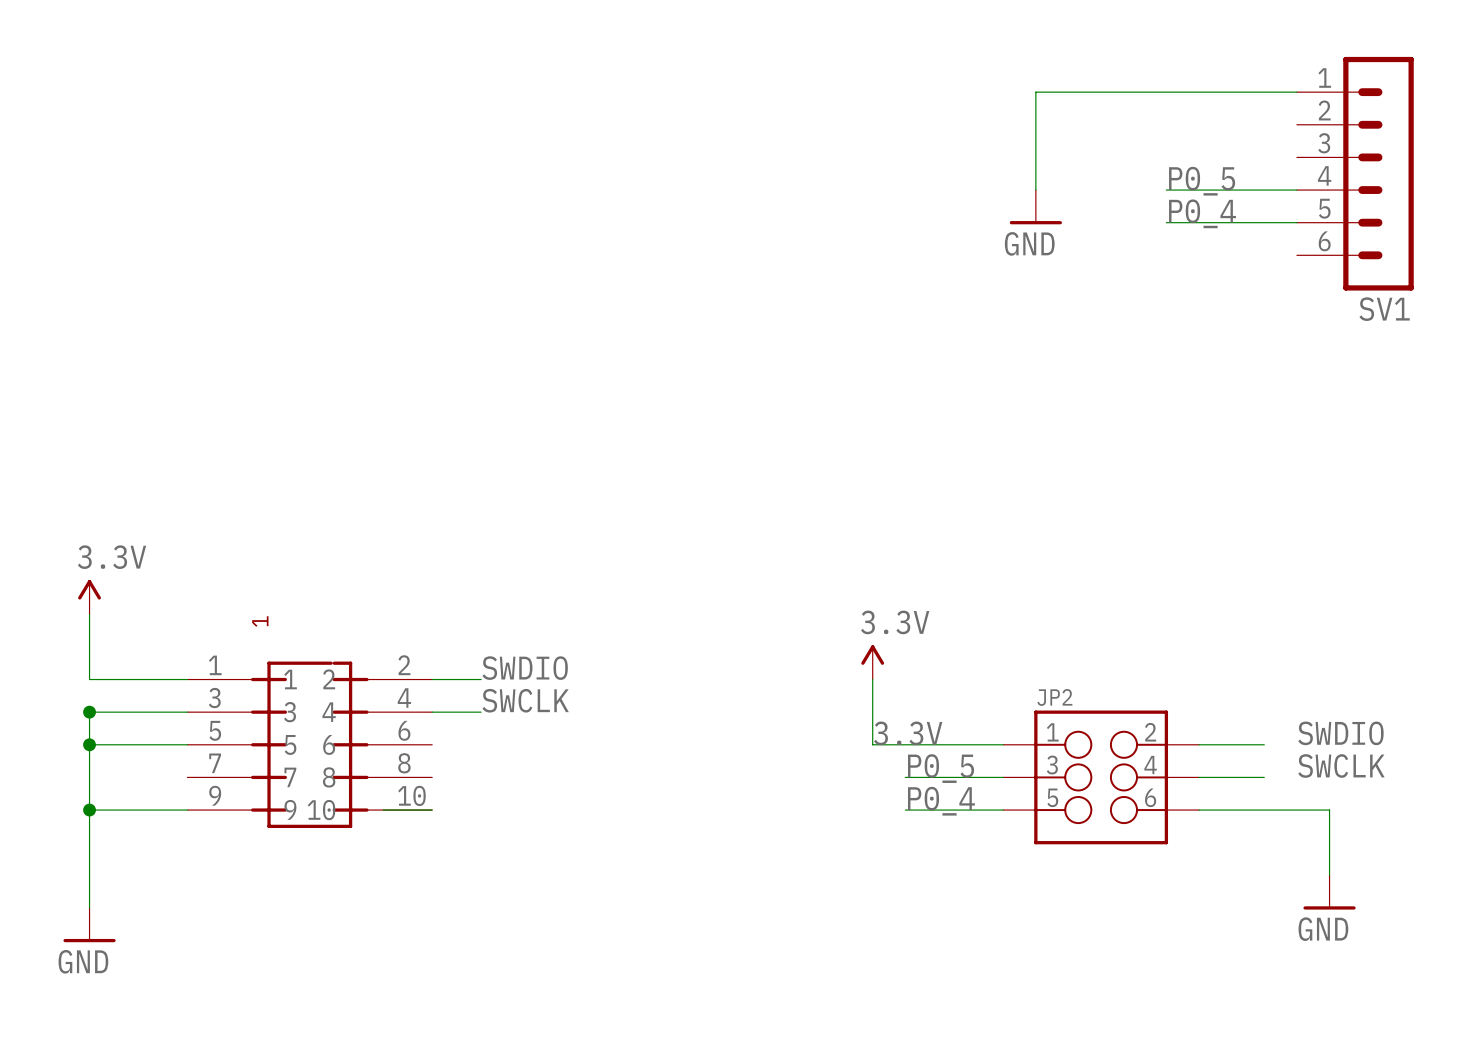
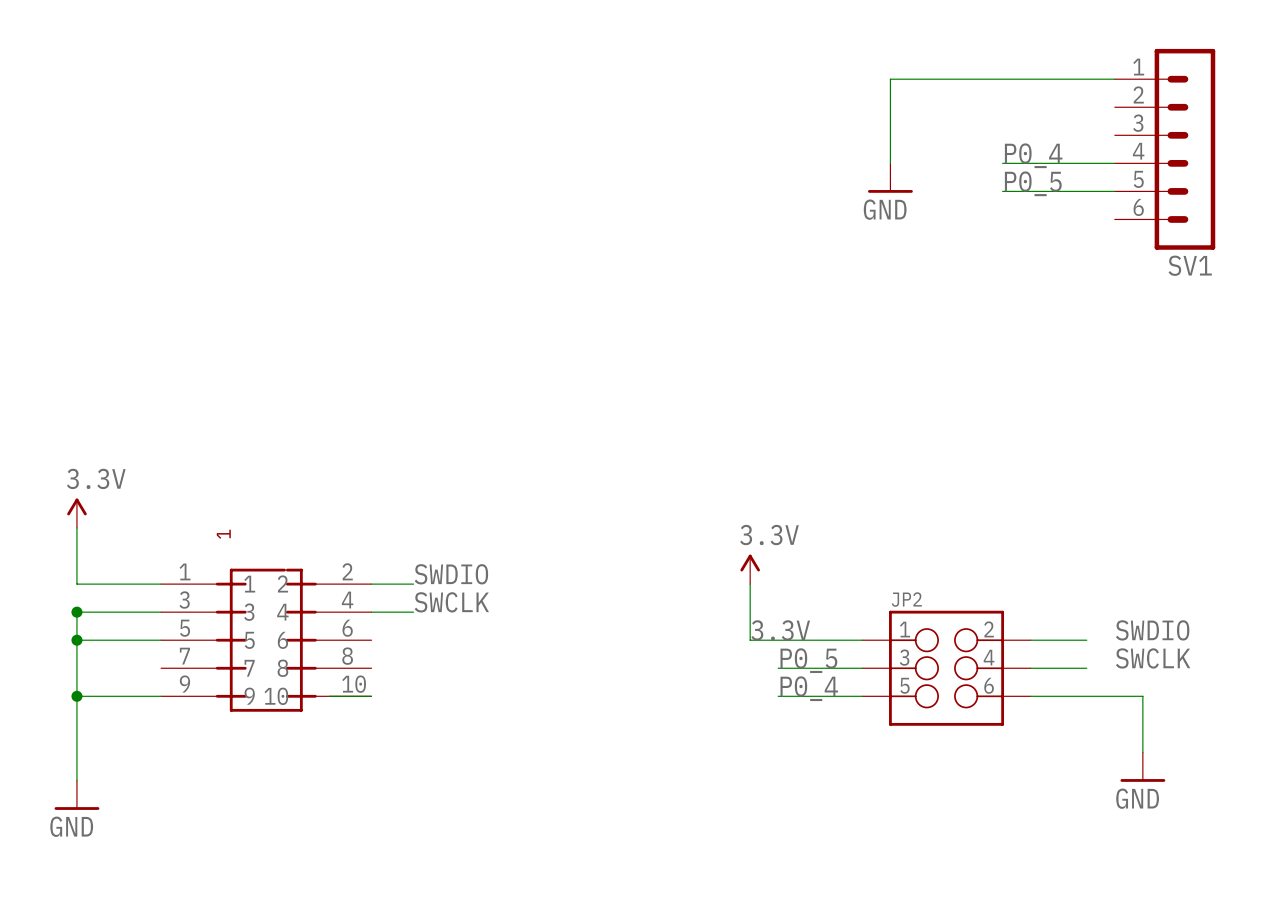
label: P0_5 (1202, 181) -> P0_4 (1033, 155)
label: P0_4 (1202, 213) -> P0_5 (1033, 183)

